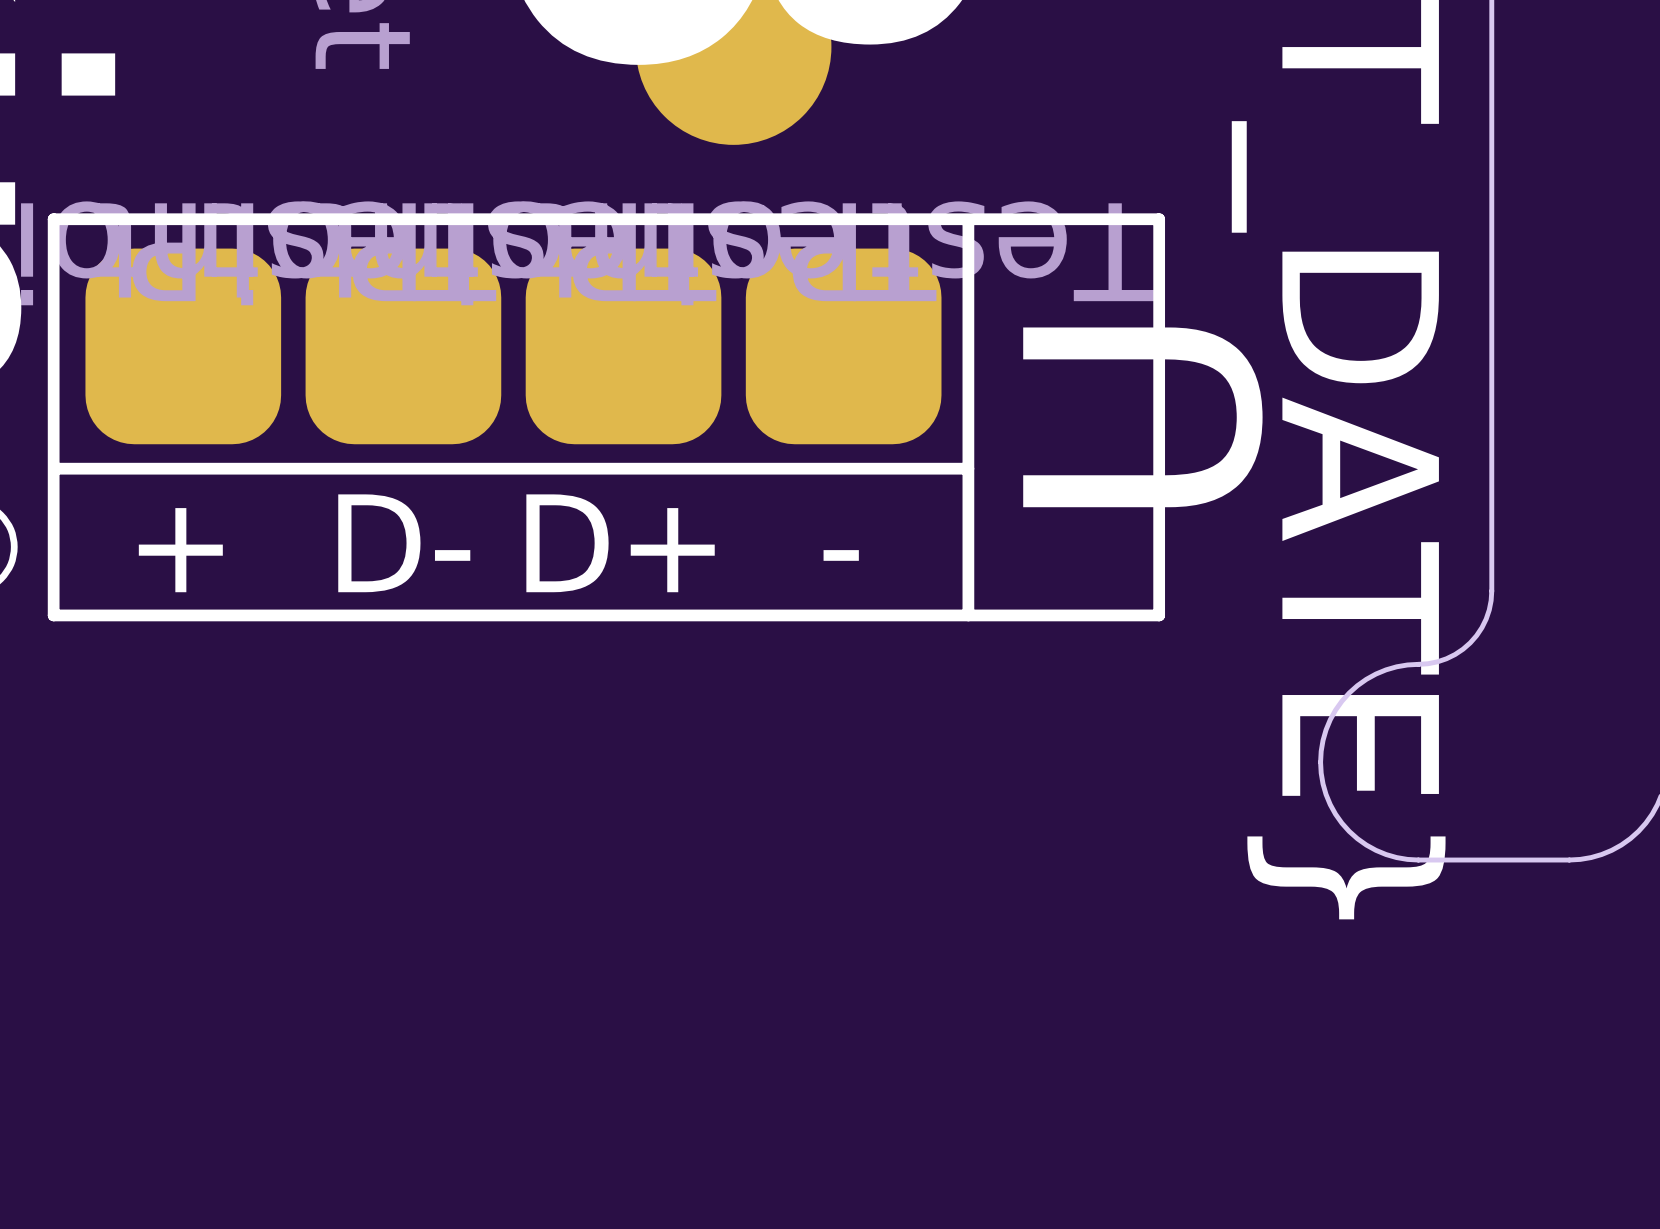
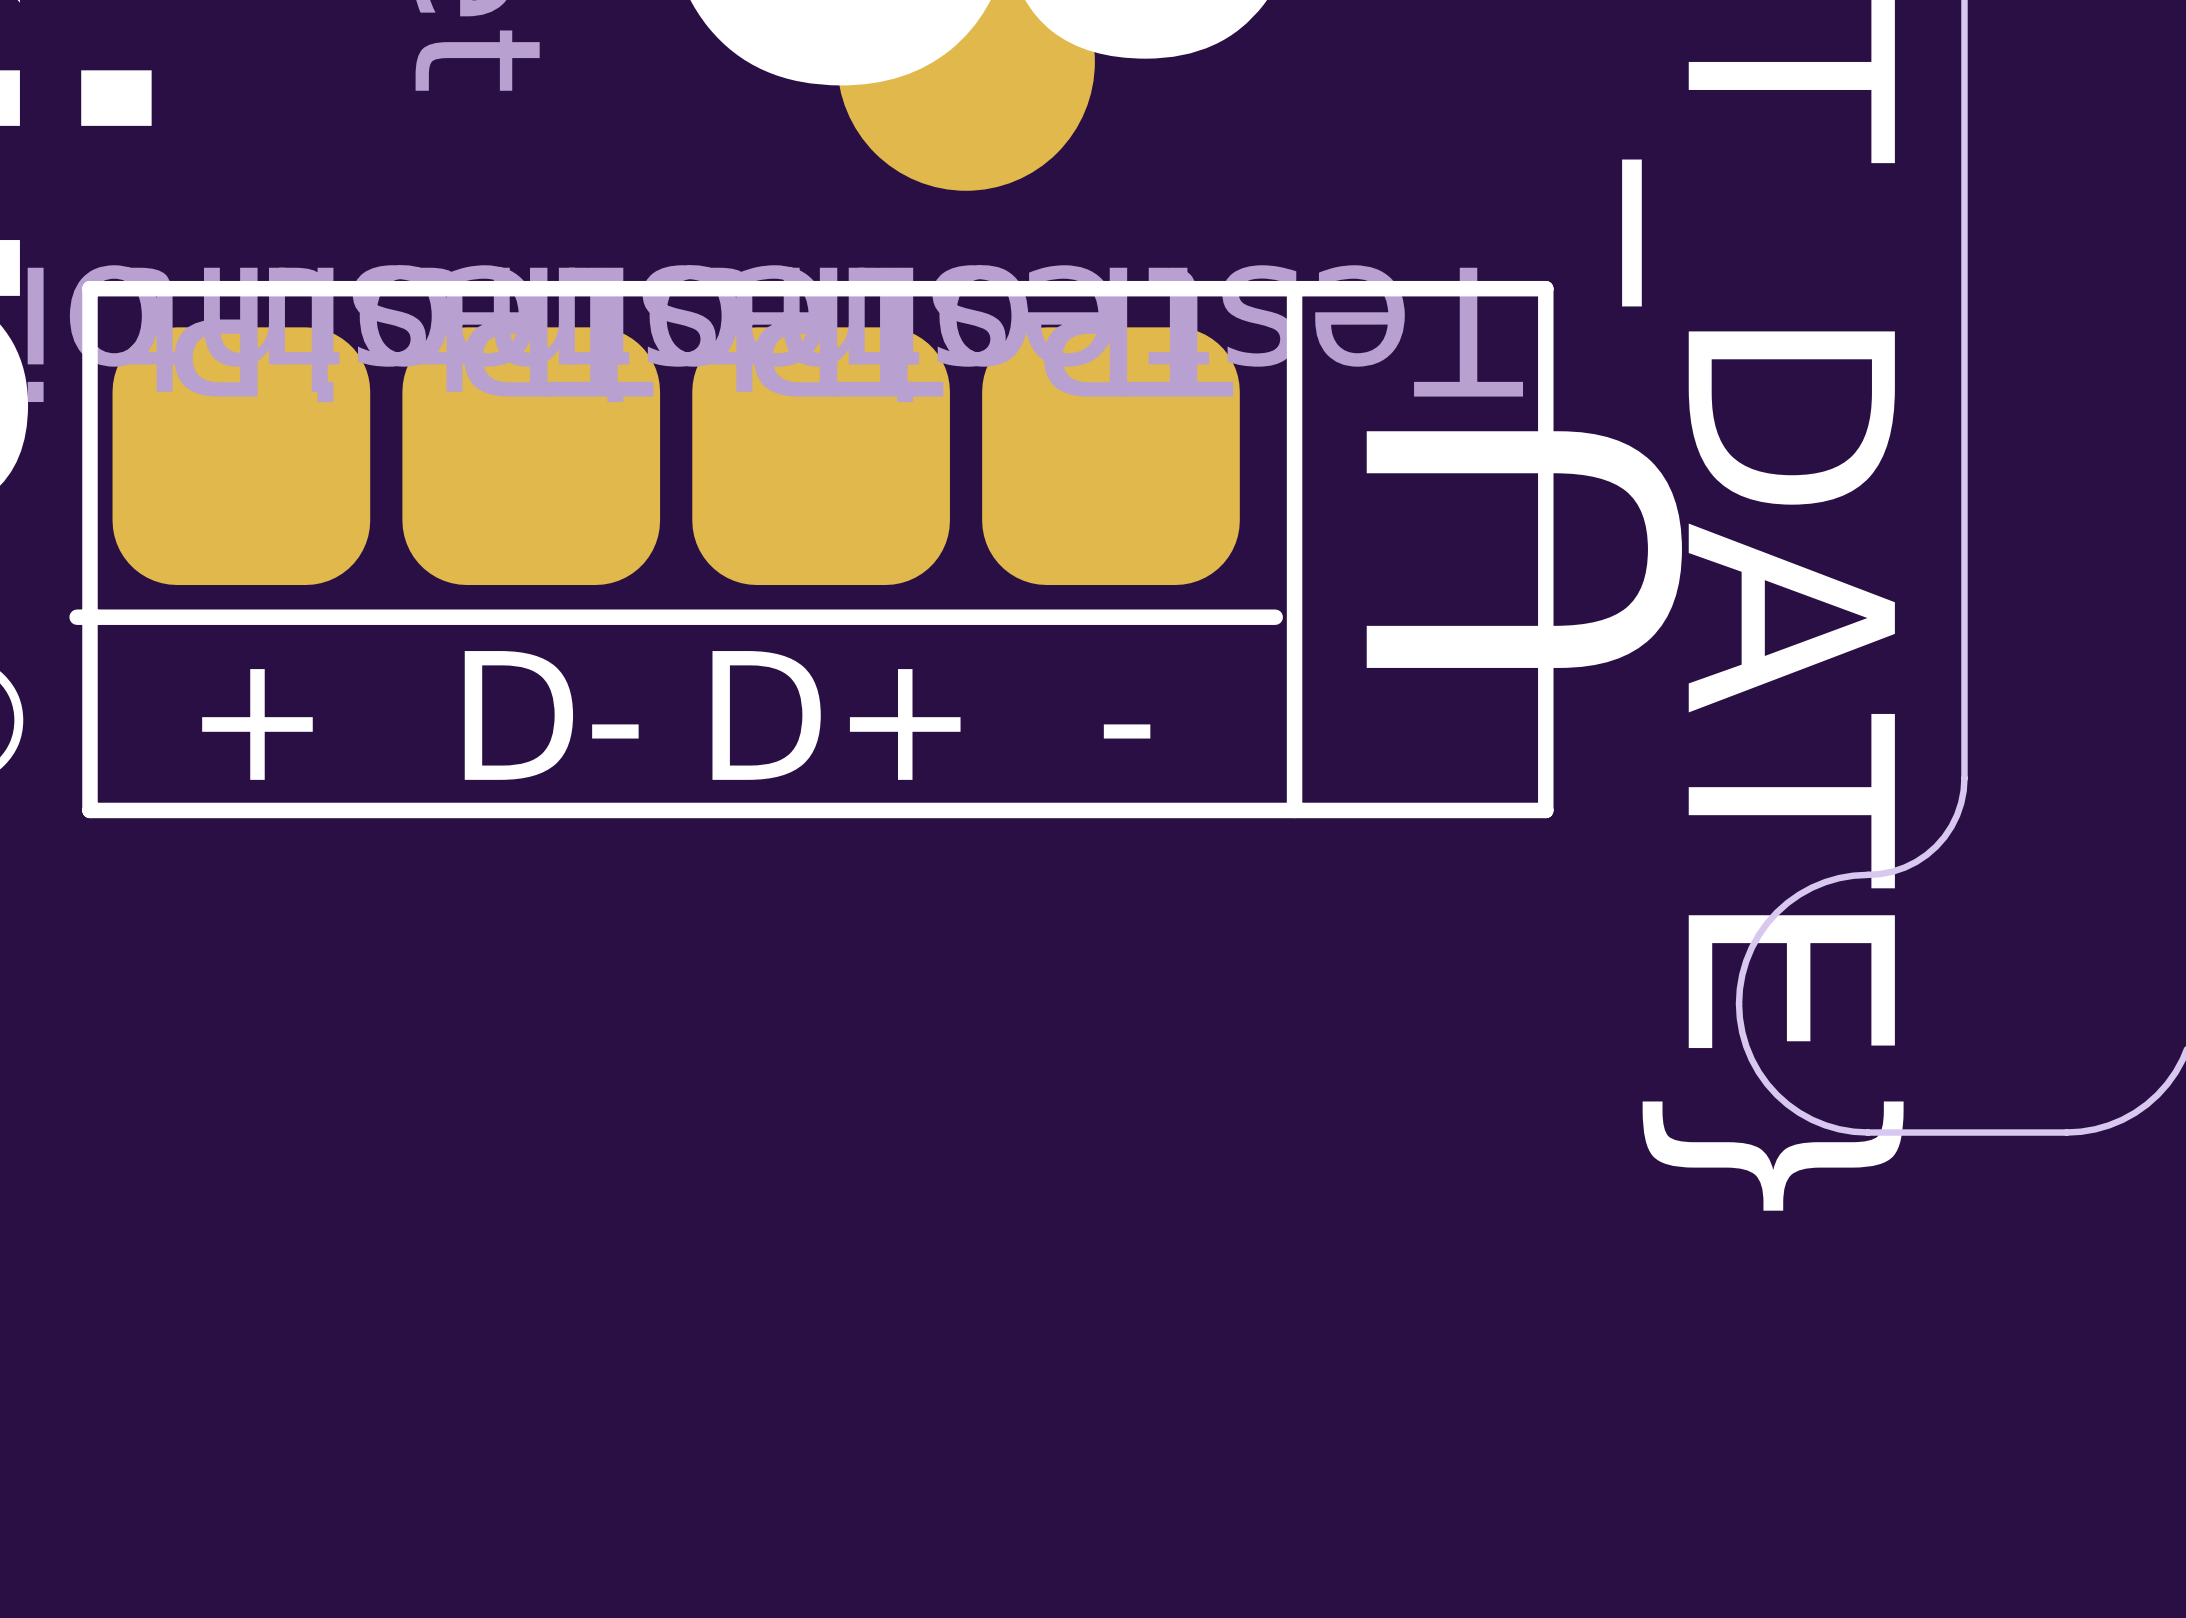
line: (68, 219) (53, 219) (53, 615) (68, 615) -> (89, 288) (89, 810)
line: (1159, 219) (1159, 615) -> (1526, 288) (1545, 288) (1545, 810) (1526, 810)
line: (968, 224) (968, 615) -> (1294, 295) (1294, 810)
text position: U (1142, 417) -> U (1524, 549)
text position: D- (404, 543) -> D- (551, 715)
text position: D+ (620, 543) -> D+ (836, 715)
text position: + (180, 550) -> + (257, 724)
text position: - (841, 555) -> - (1127, 731)

